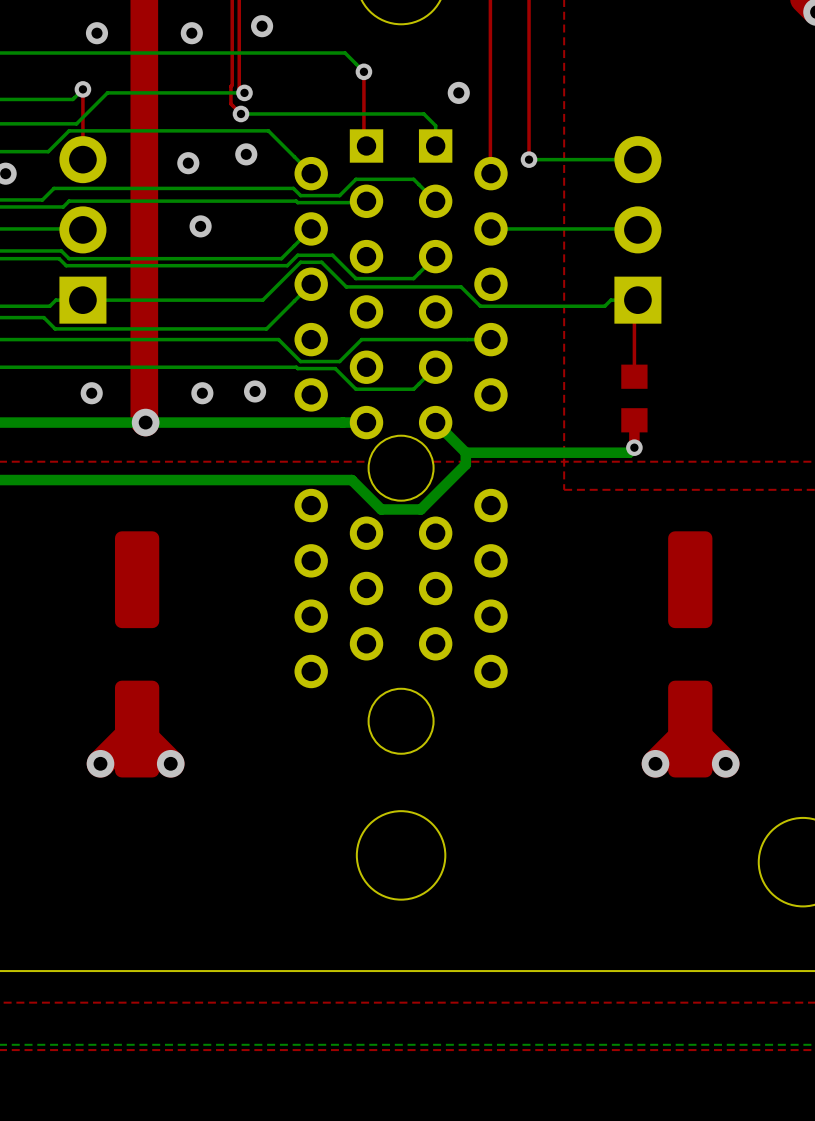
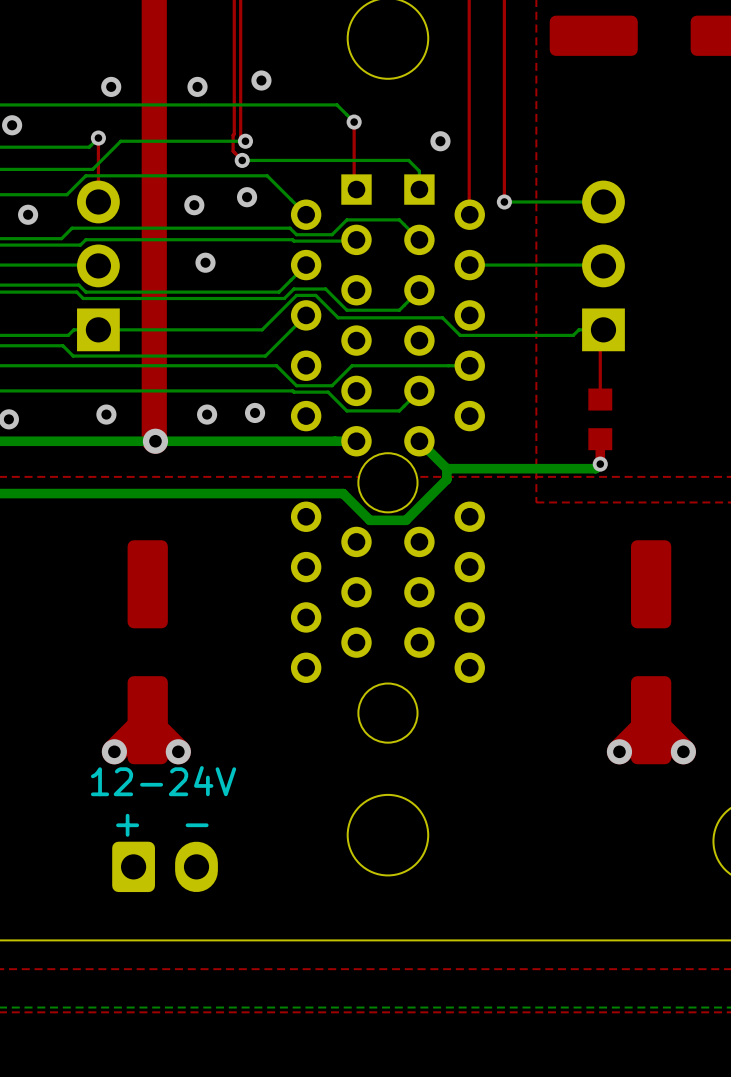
text: none -> 12-24V (163, 781)
text: none -> + - (162, 825)
part: none -> (165, 866)

